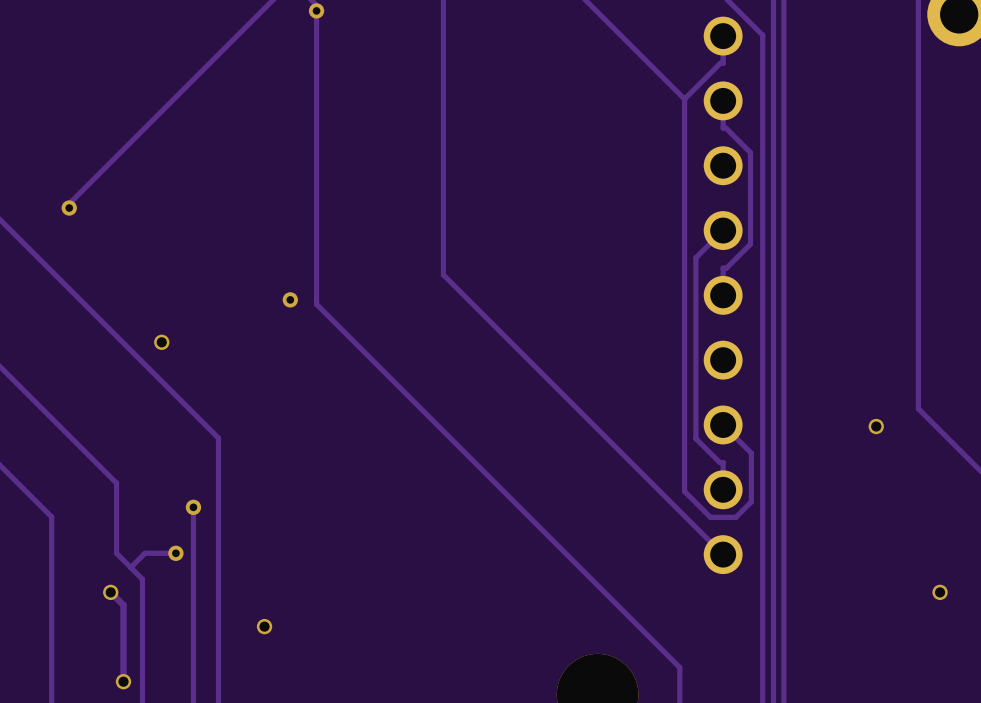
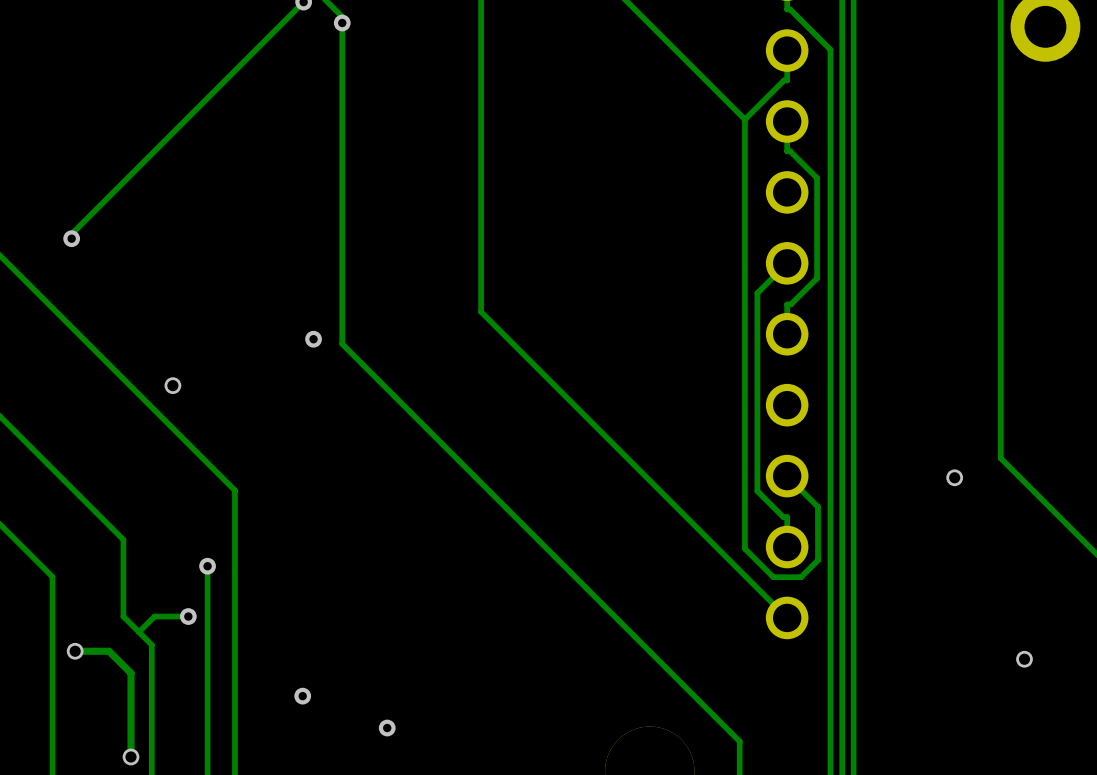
track: none -> (75, 651) (109, 651) (117, 659)
via position: (110, 592) -> (75, 651)
via: (264, 626) -> none
via: none -> (302, 696)
via: none -> (387, 728)

